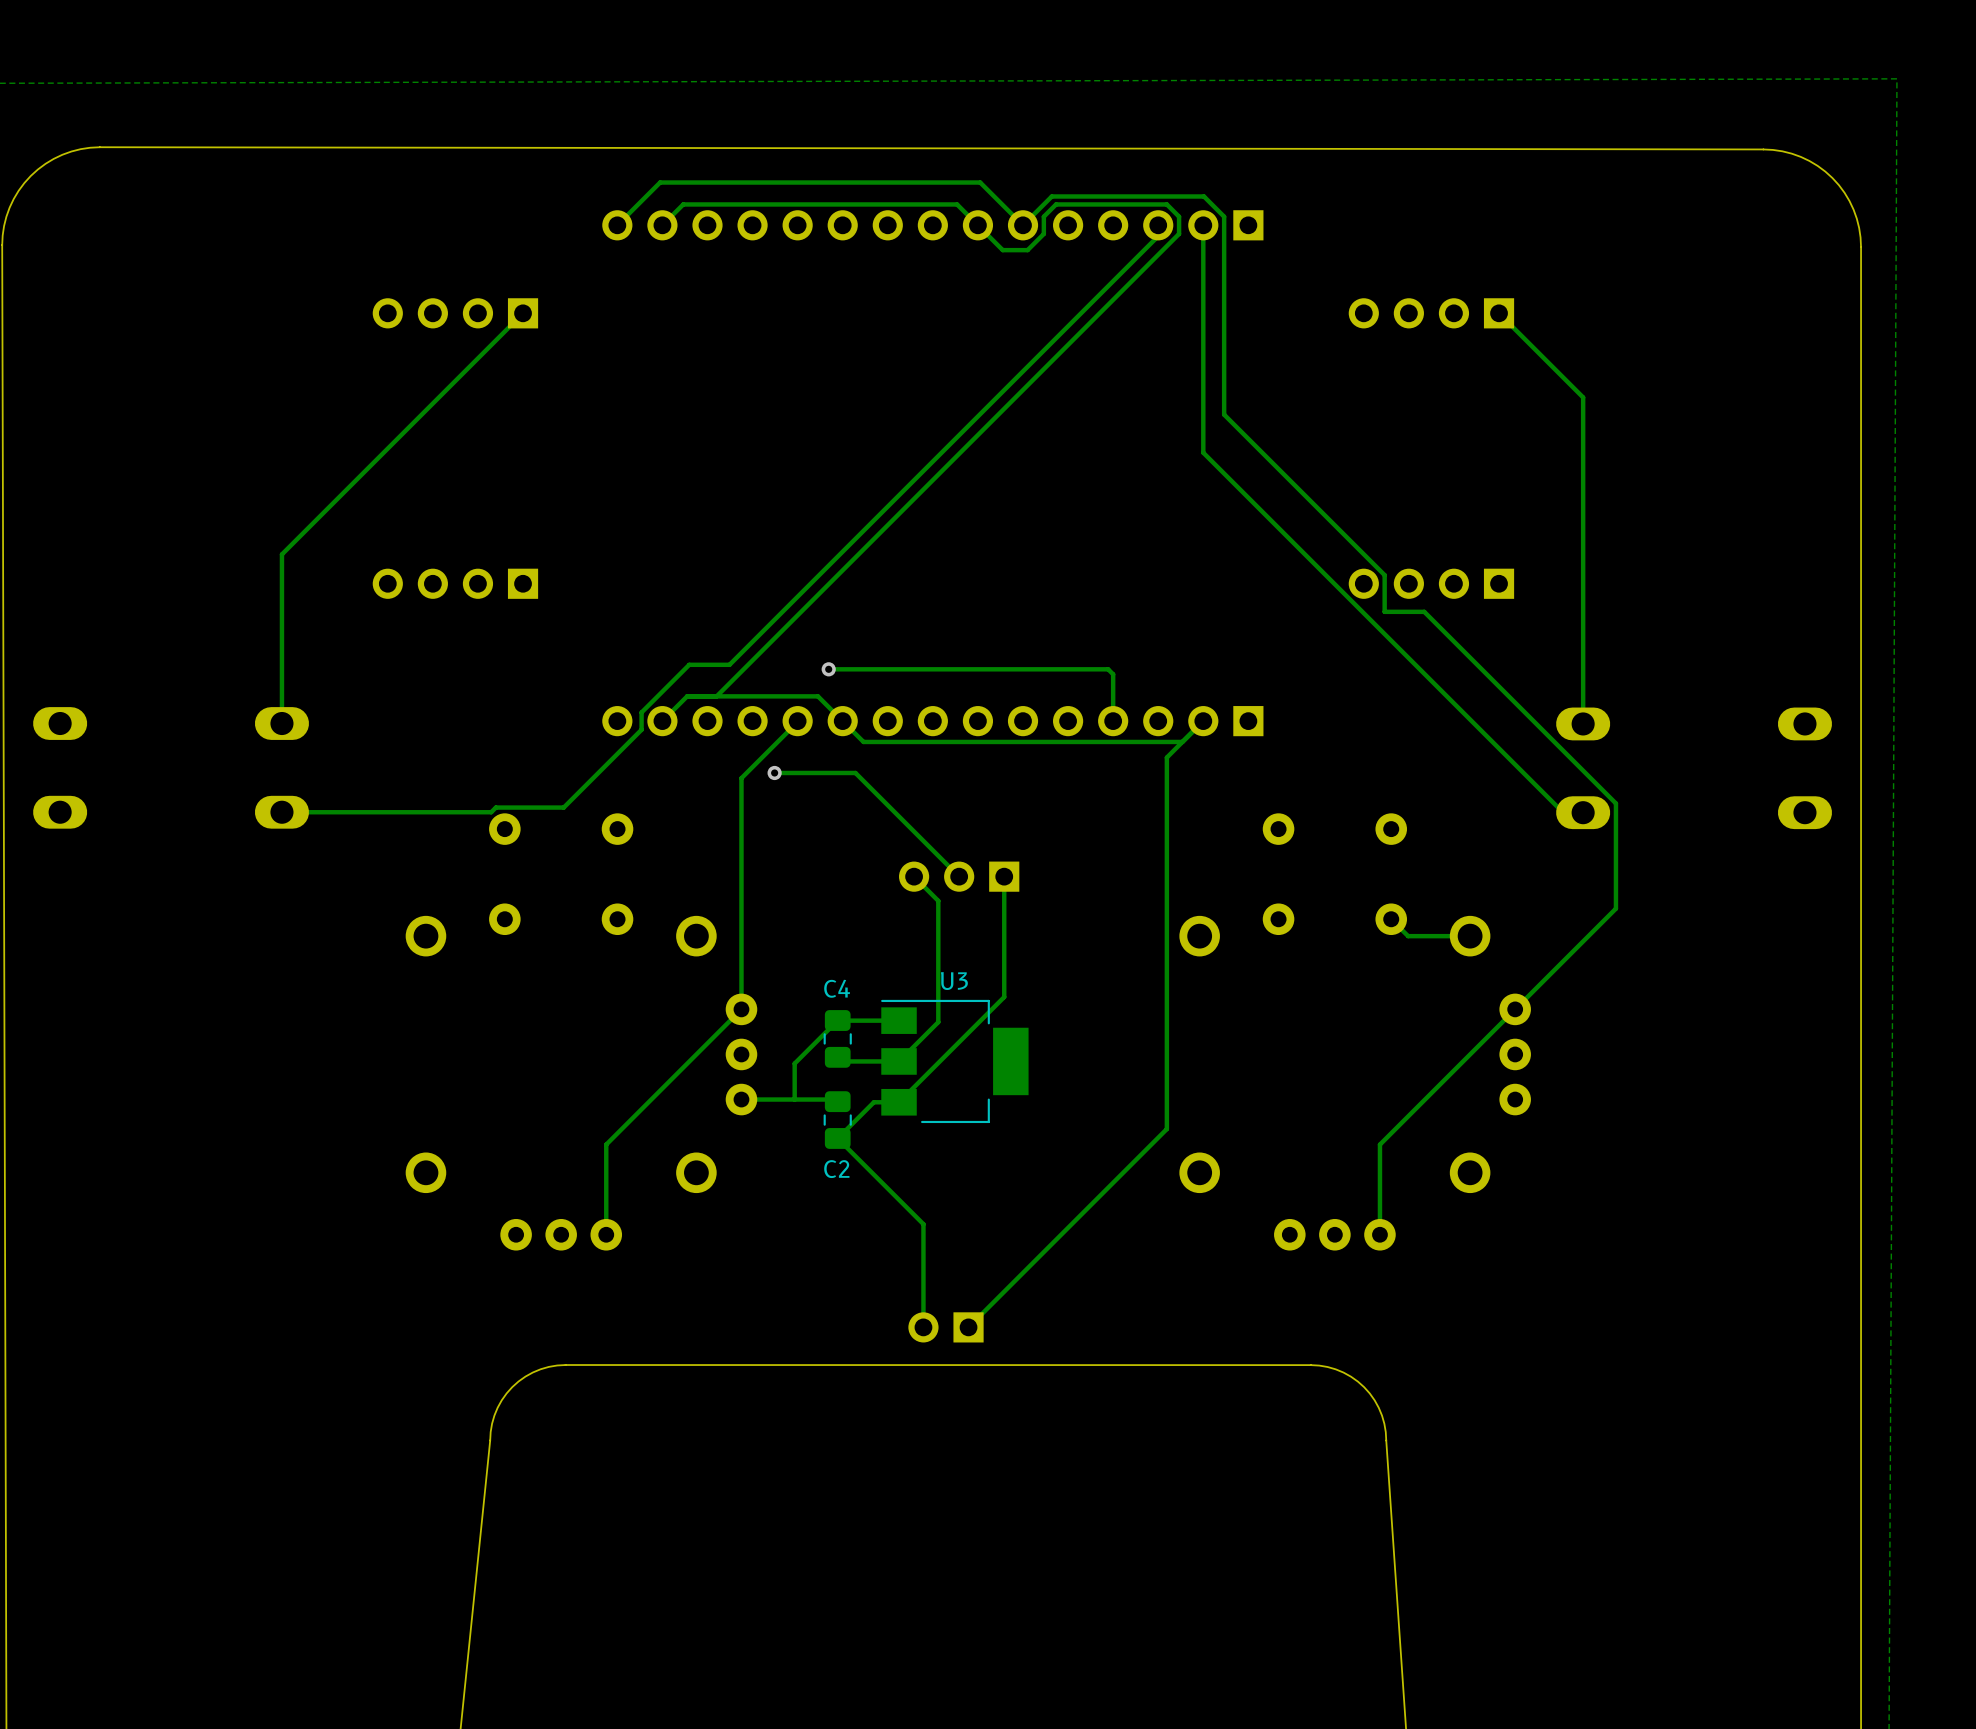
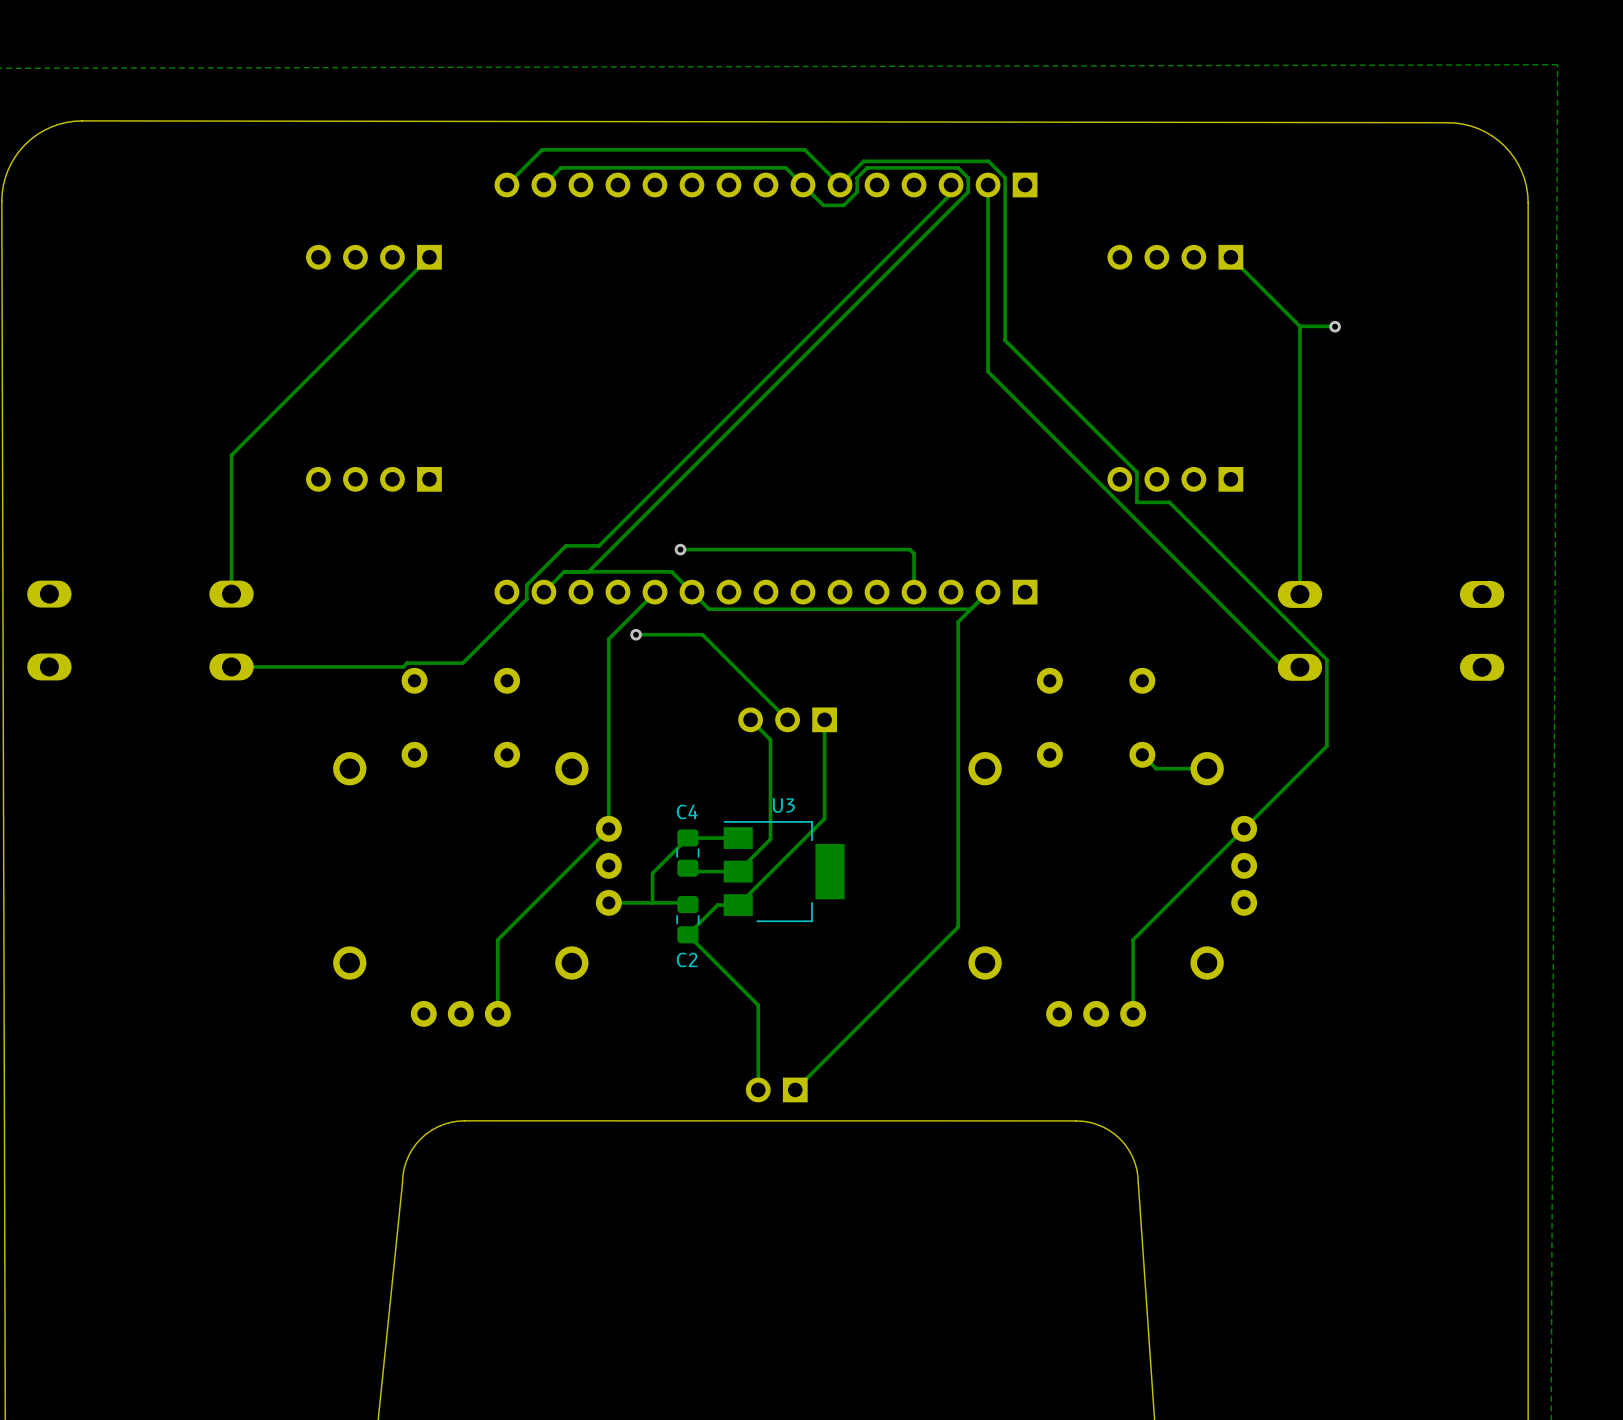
track: none -> (1299, 326) (1335, 326)
via: none -> (1335, 326)

